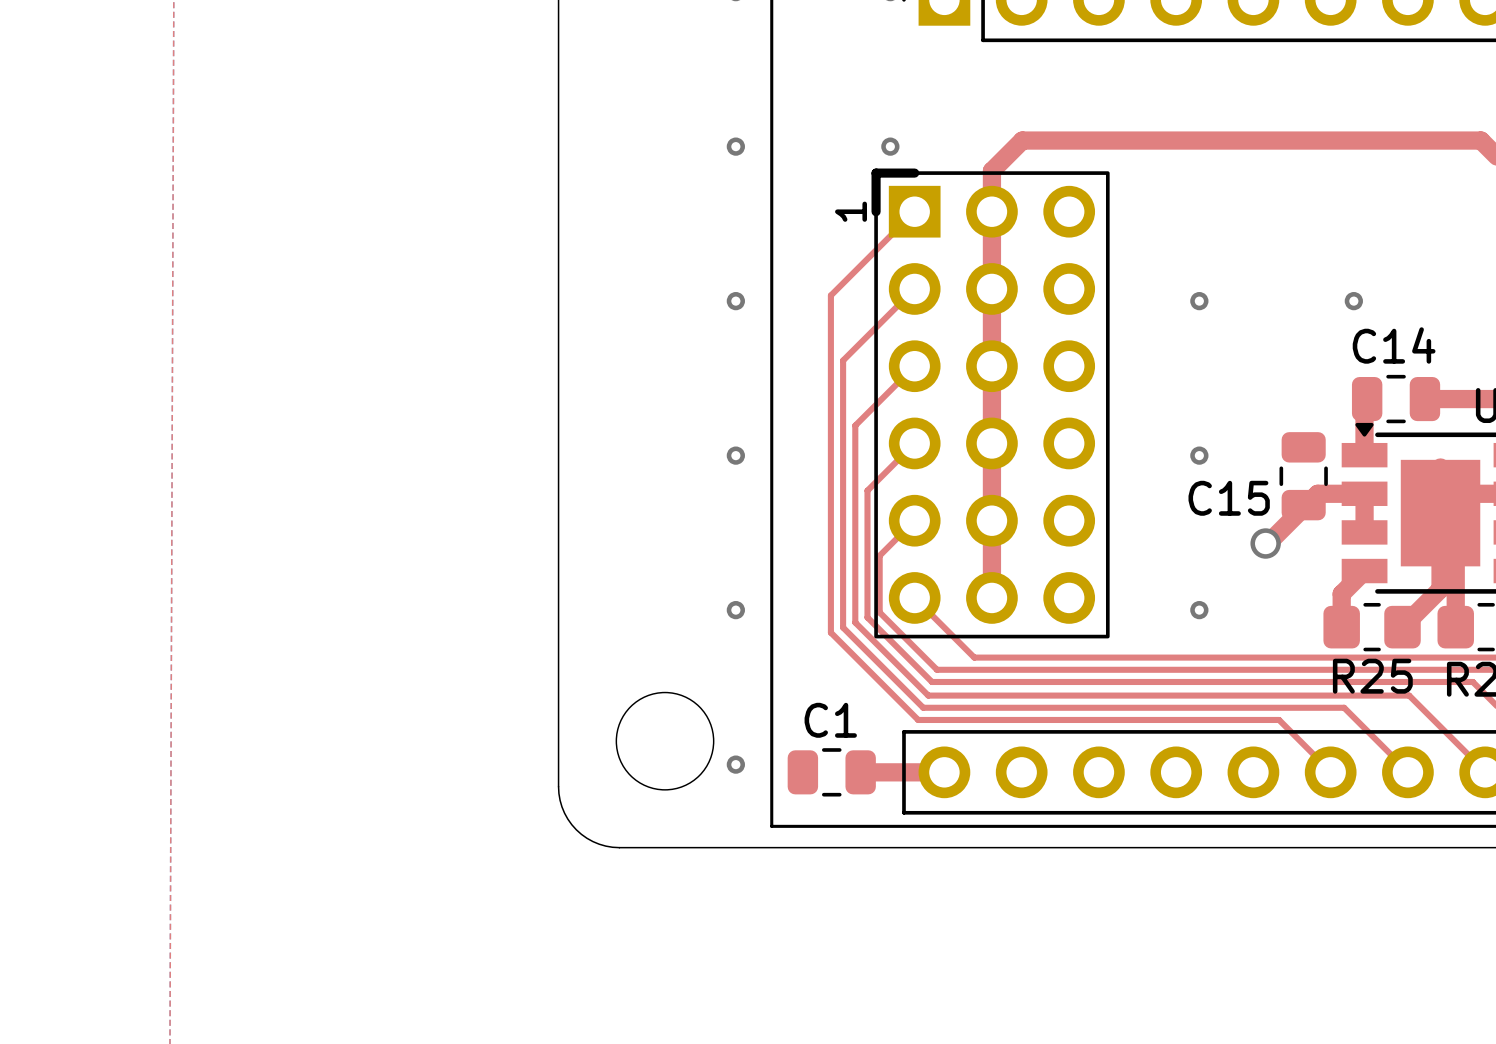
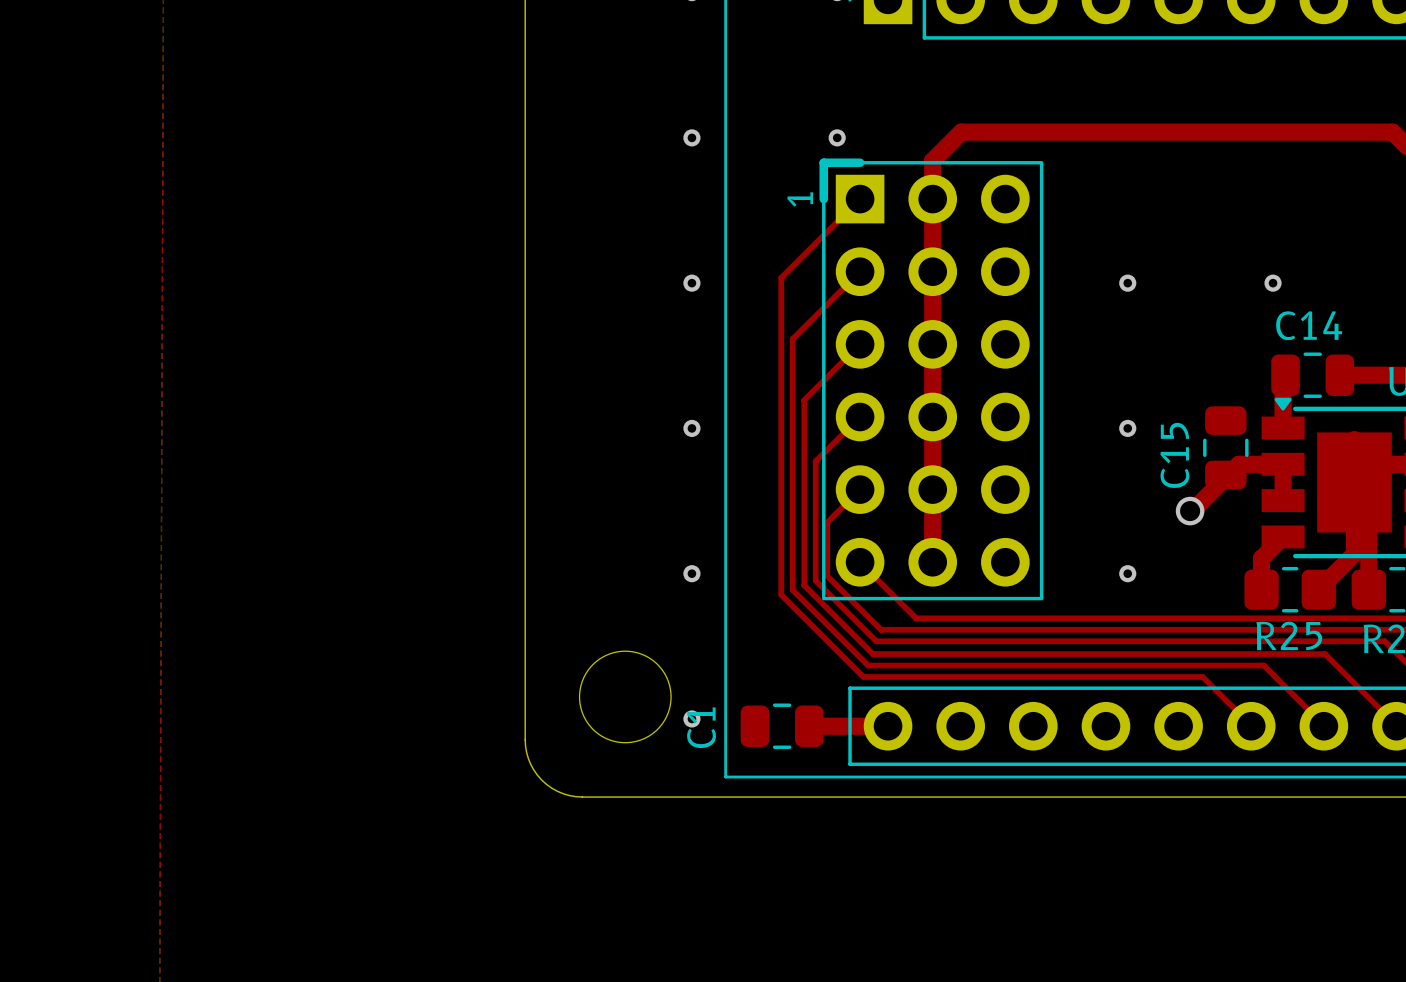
C15 name rotation: 0° (1229, 498) -> 90° counterclockwise (1174, 455)
C1 name rotation: 0° (830, 720) -> 90° counterclockwise (701, 727)
C1 name position: C1 (830, 720) -> C1 (701, 727)

